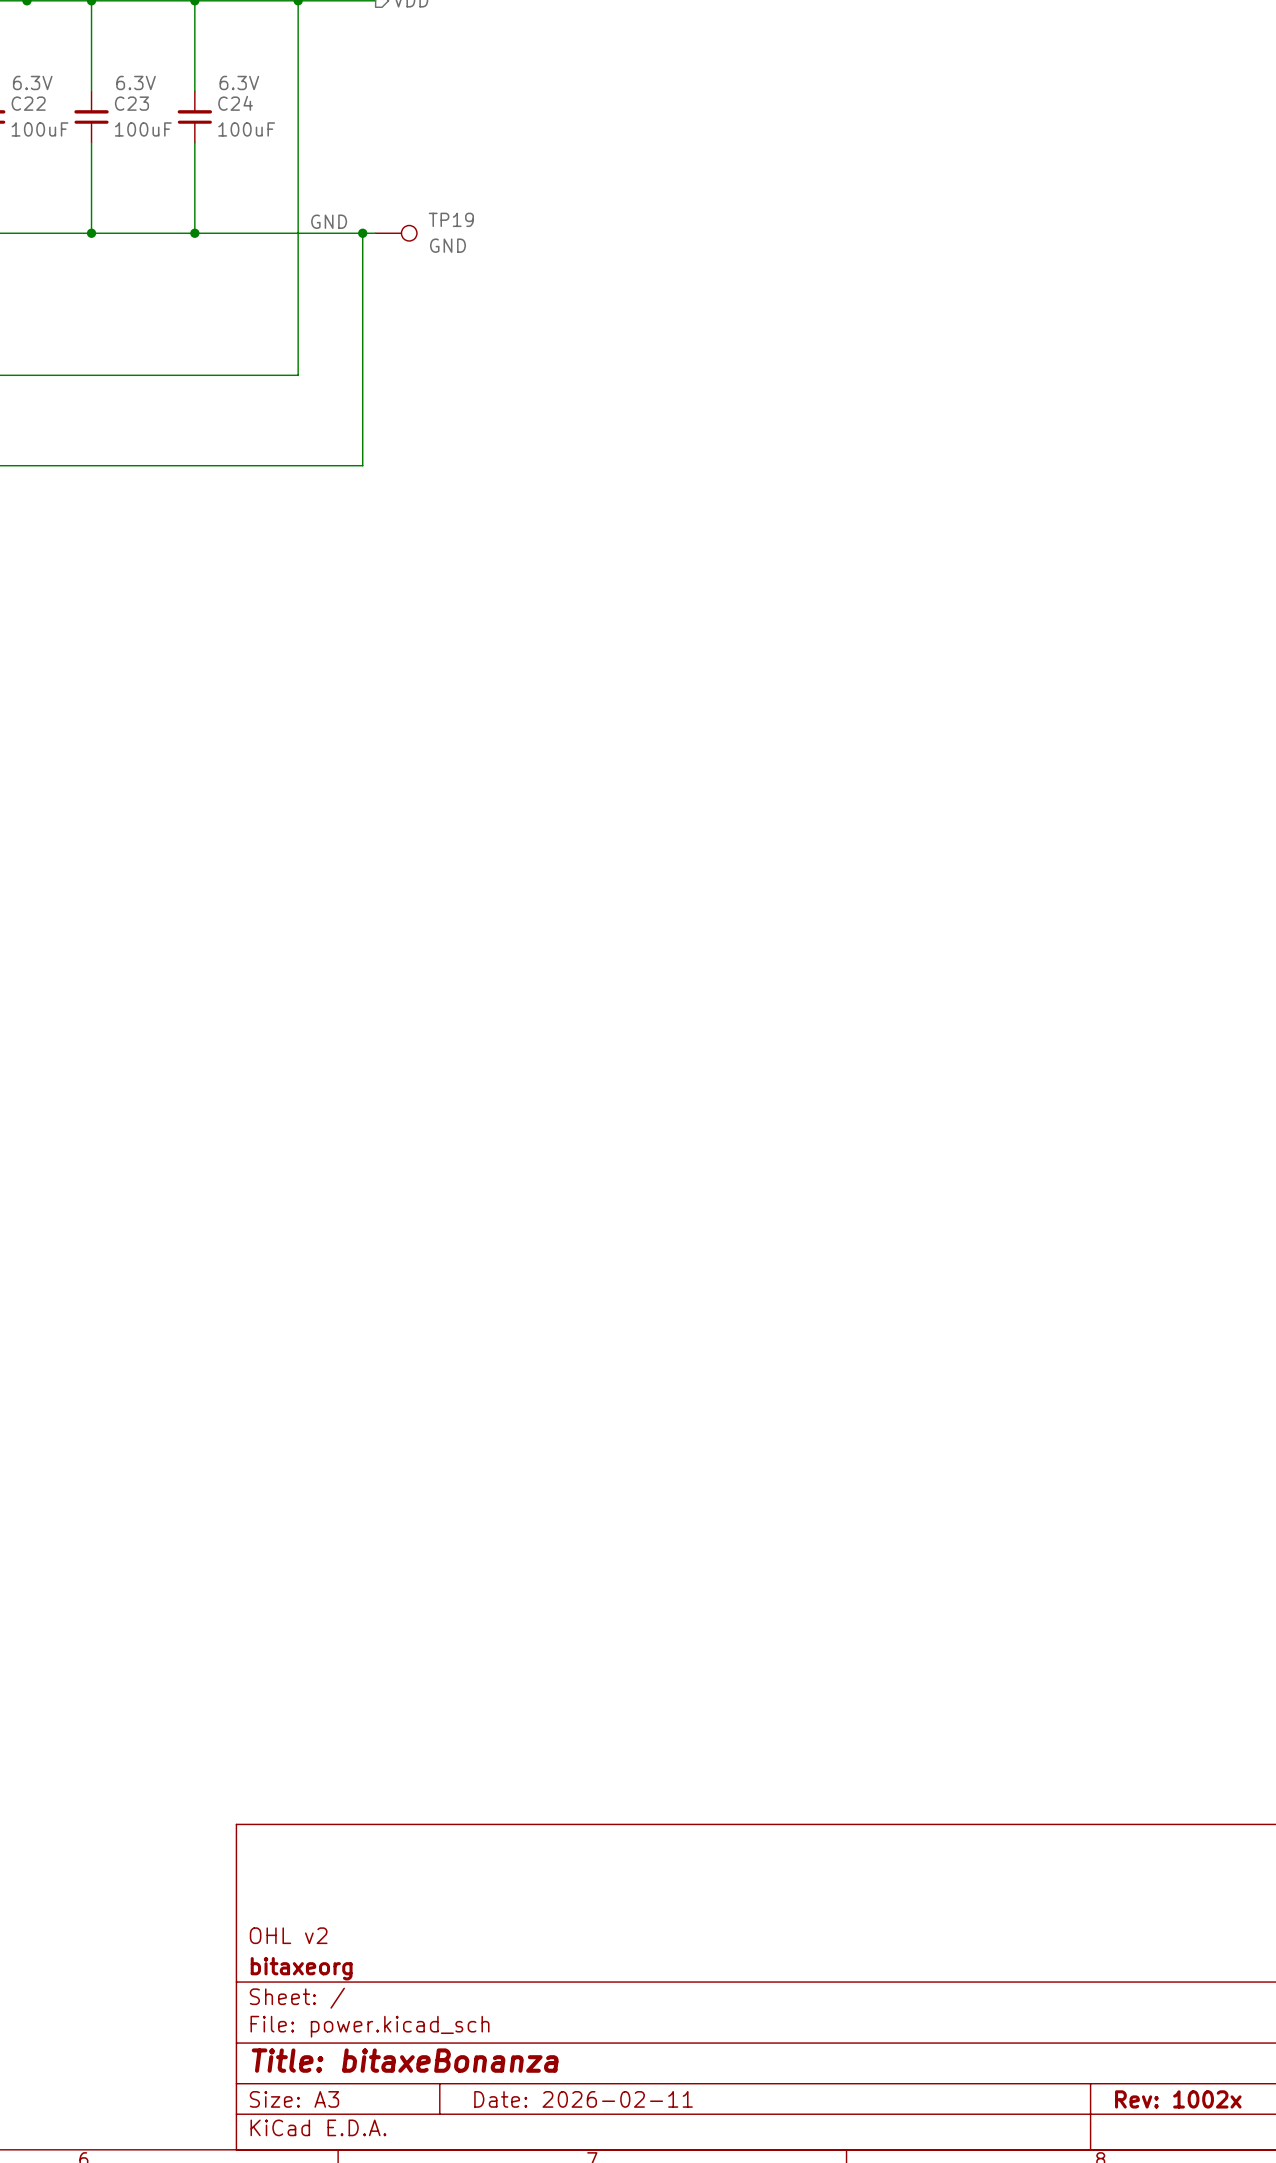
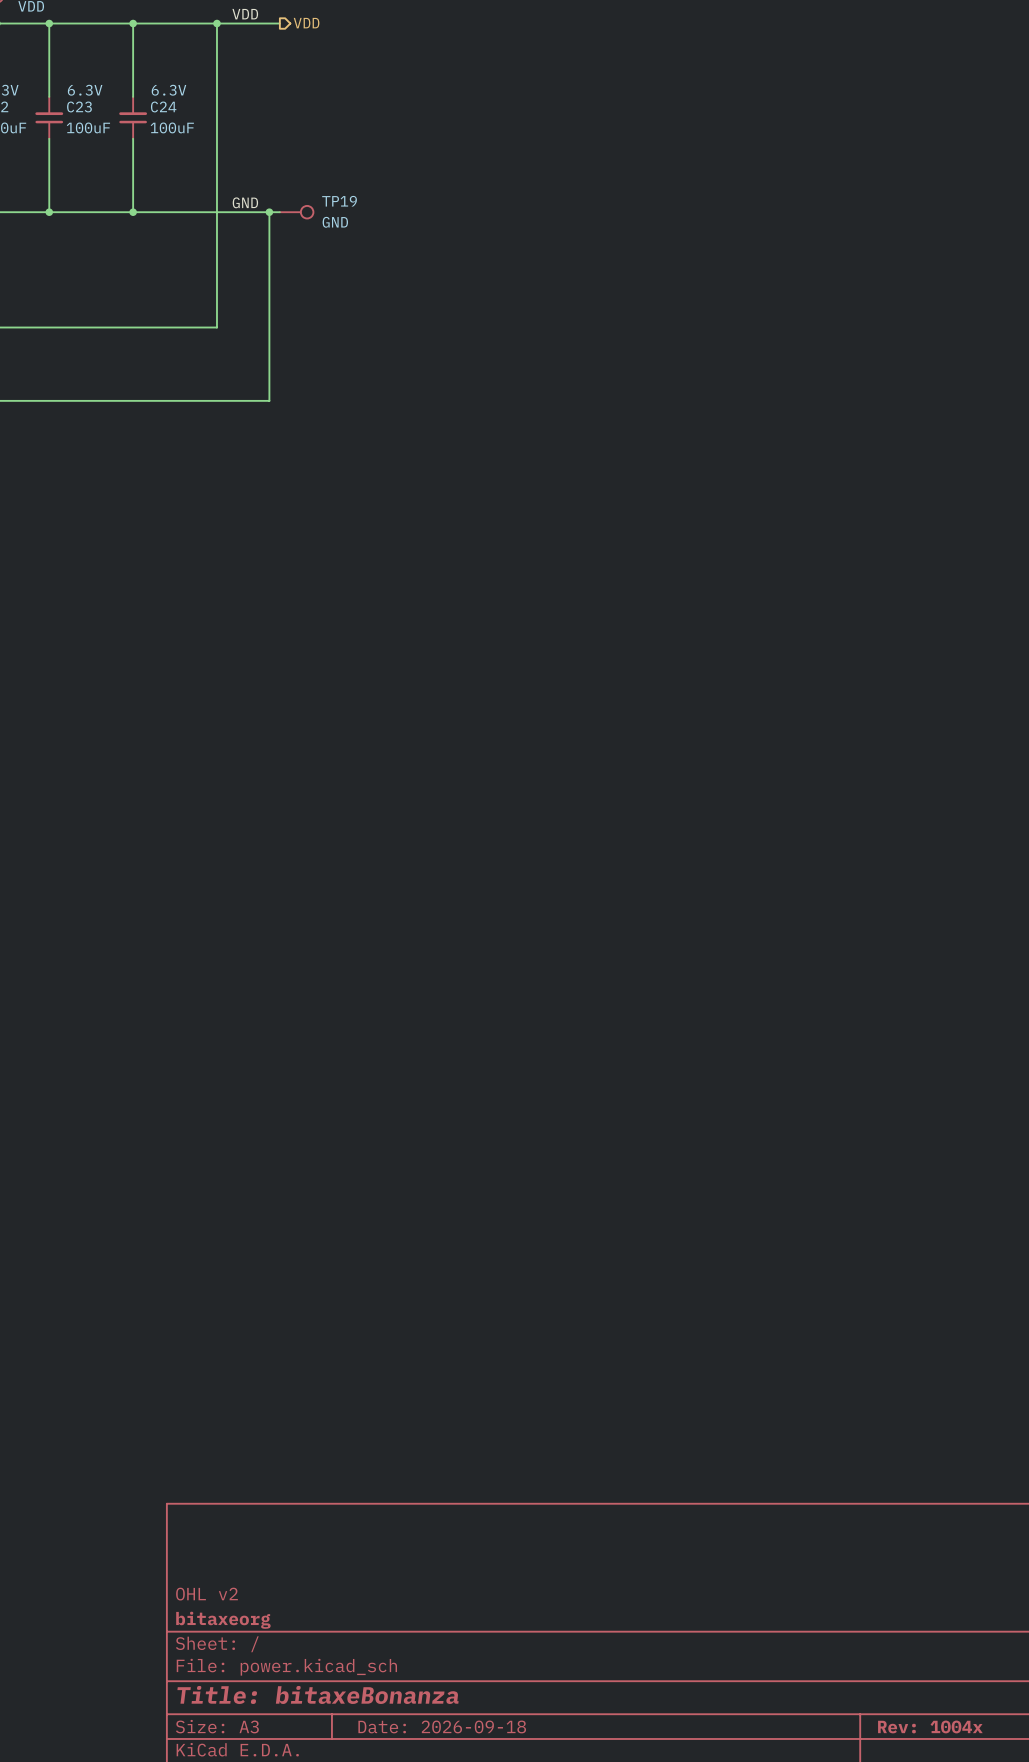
title block: Date: 2026-02-11 (583, 2099) -> Date: 2026-09-18 (442, 1726)
title block: Rev: 1002x (1178, 2099) -> Rev: 1004x (930, 1726)

